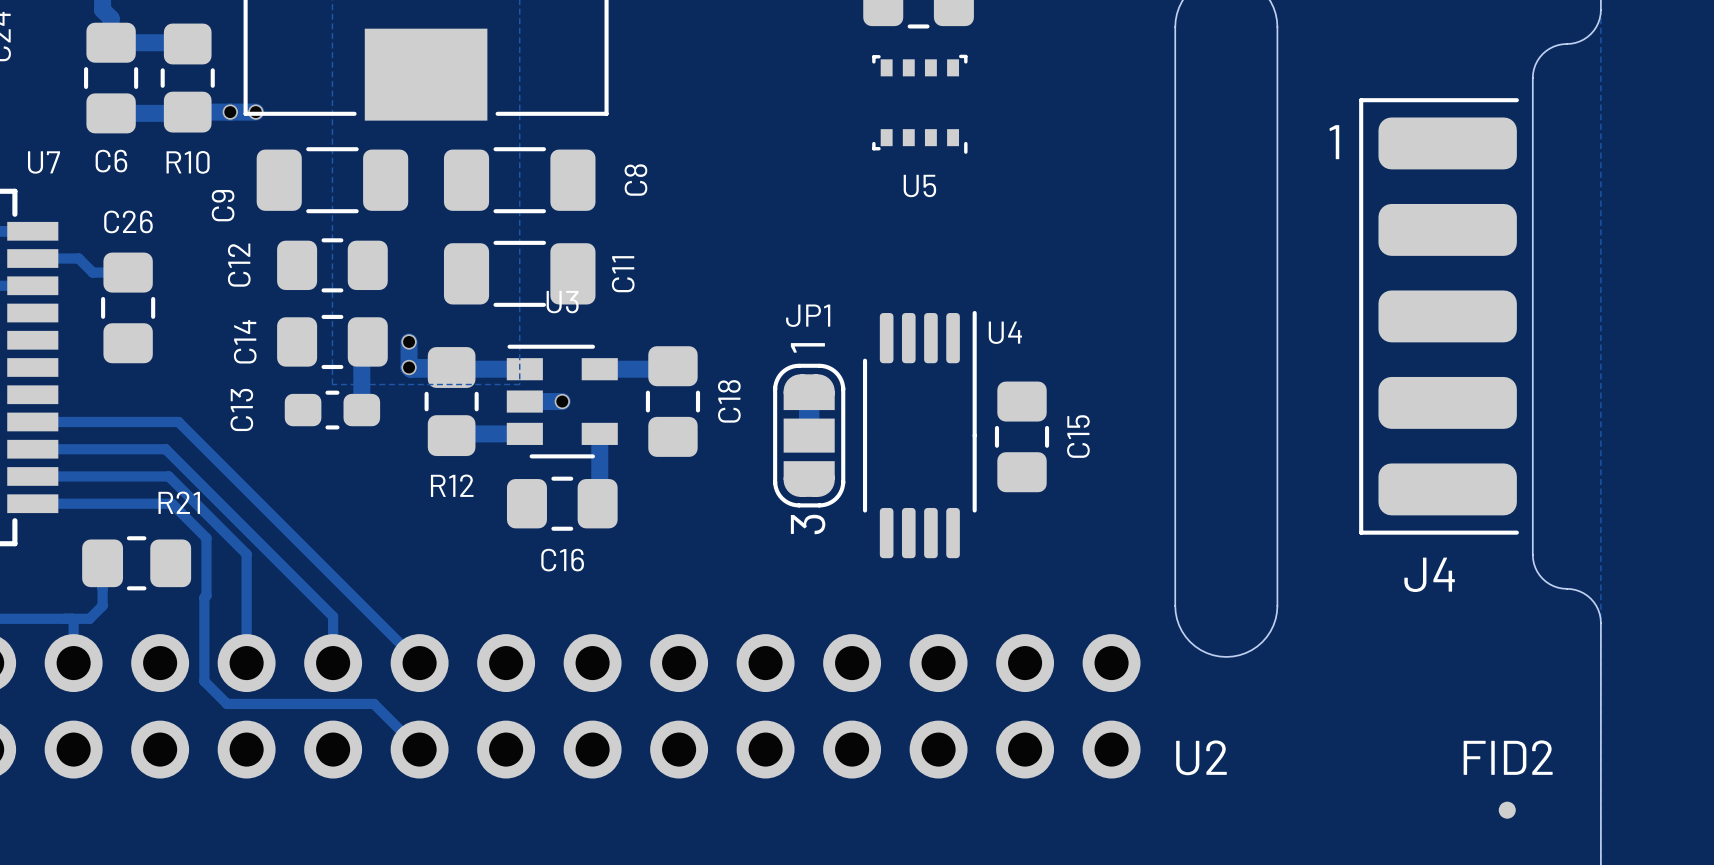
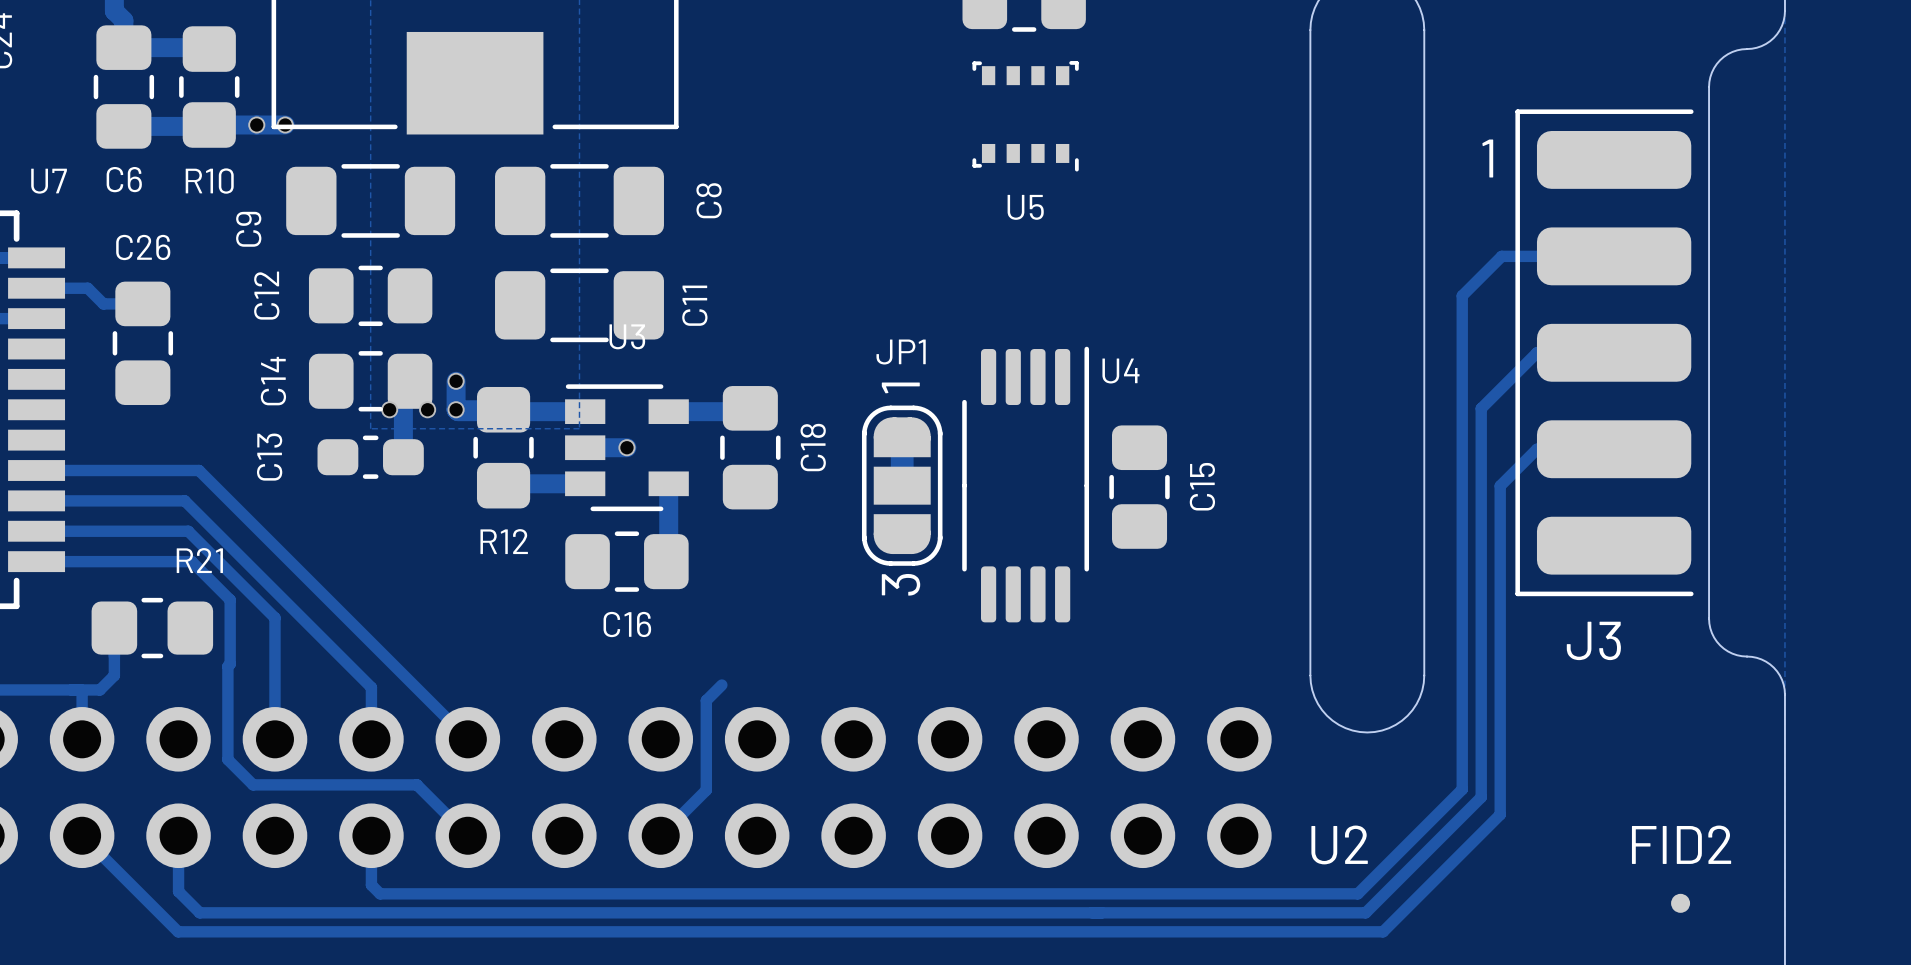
track: none -> (1614, 256) (1501, 256) (1462, 295) (1462, 789) (1357, 893) (380, 893) (371, 885) (371, 835)
track: none -> (1614, 352) (1536, 352) (1481, 408) (1481, 797) (1365, 912) (199, 912) (178, 891) (178, 835)
via: none -> (389, 409)
via: none -> (427, 409)
track: none -> (1614, 449) (1536, 449) (1500, 485) (1500, 814) (1383, 931) (178, 931) (82, 835)
J4 name: J4 (1429, 574) -> J3 (1593, 640)
track: none -> (721, 685) (706, 700) (706, 790) (660, 835)

